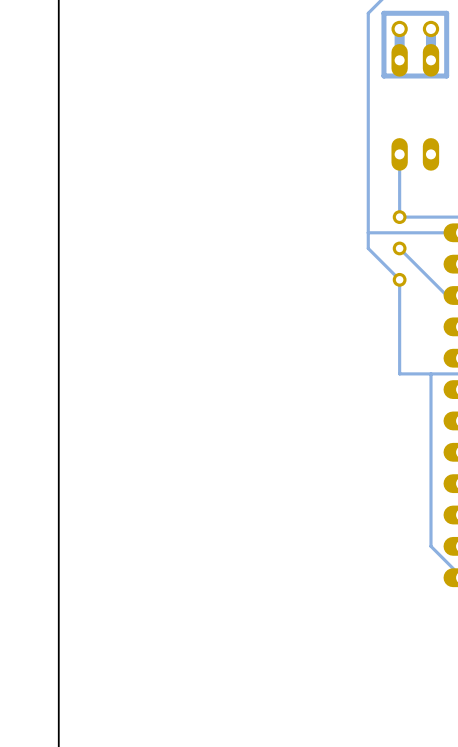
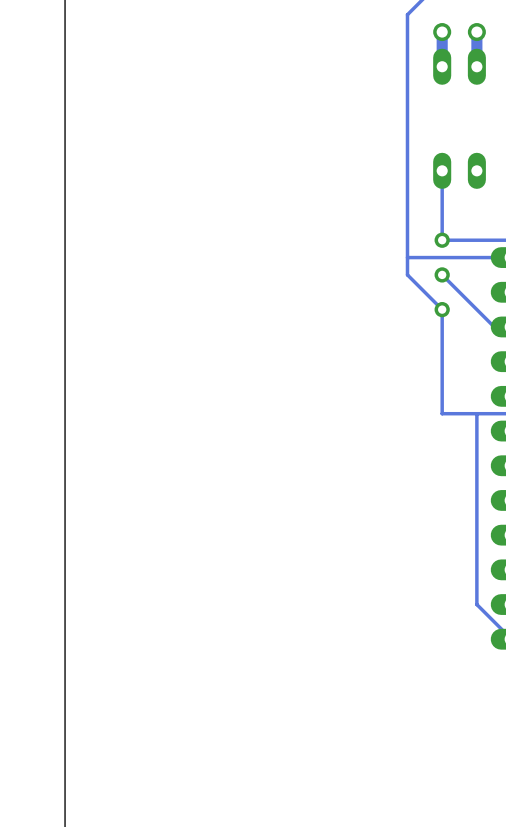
bottom track: (446, 13) (383, 13) (383, 76) (446, 76) (446, 13) -> none

